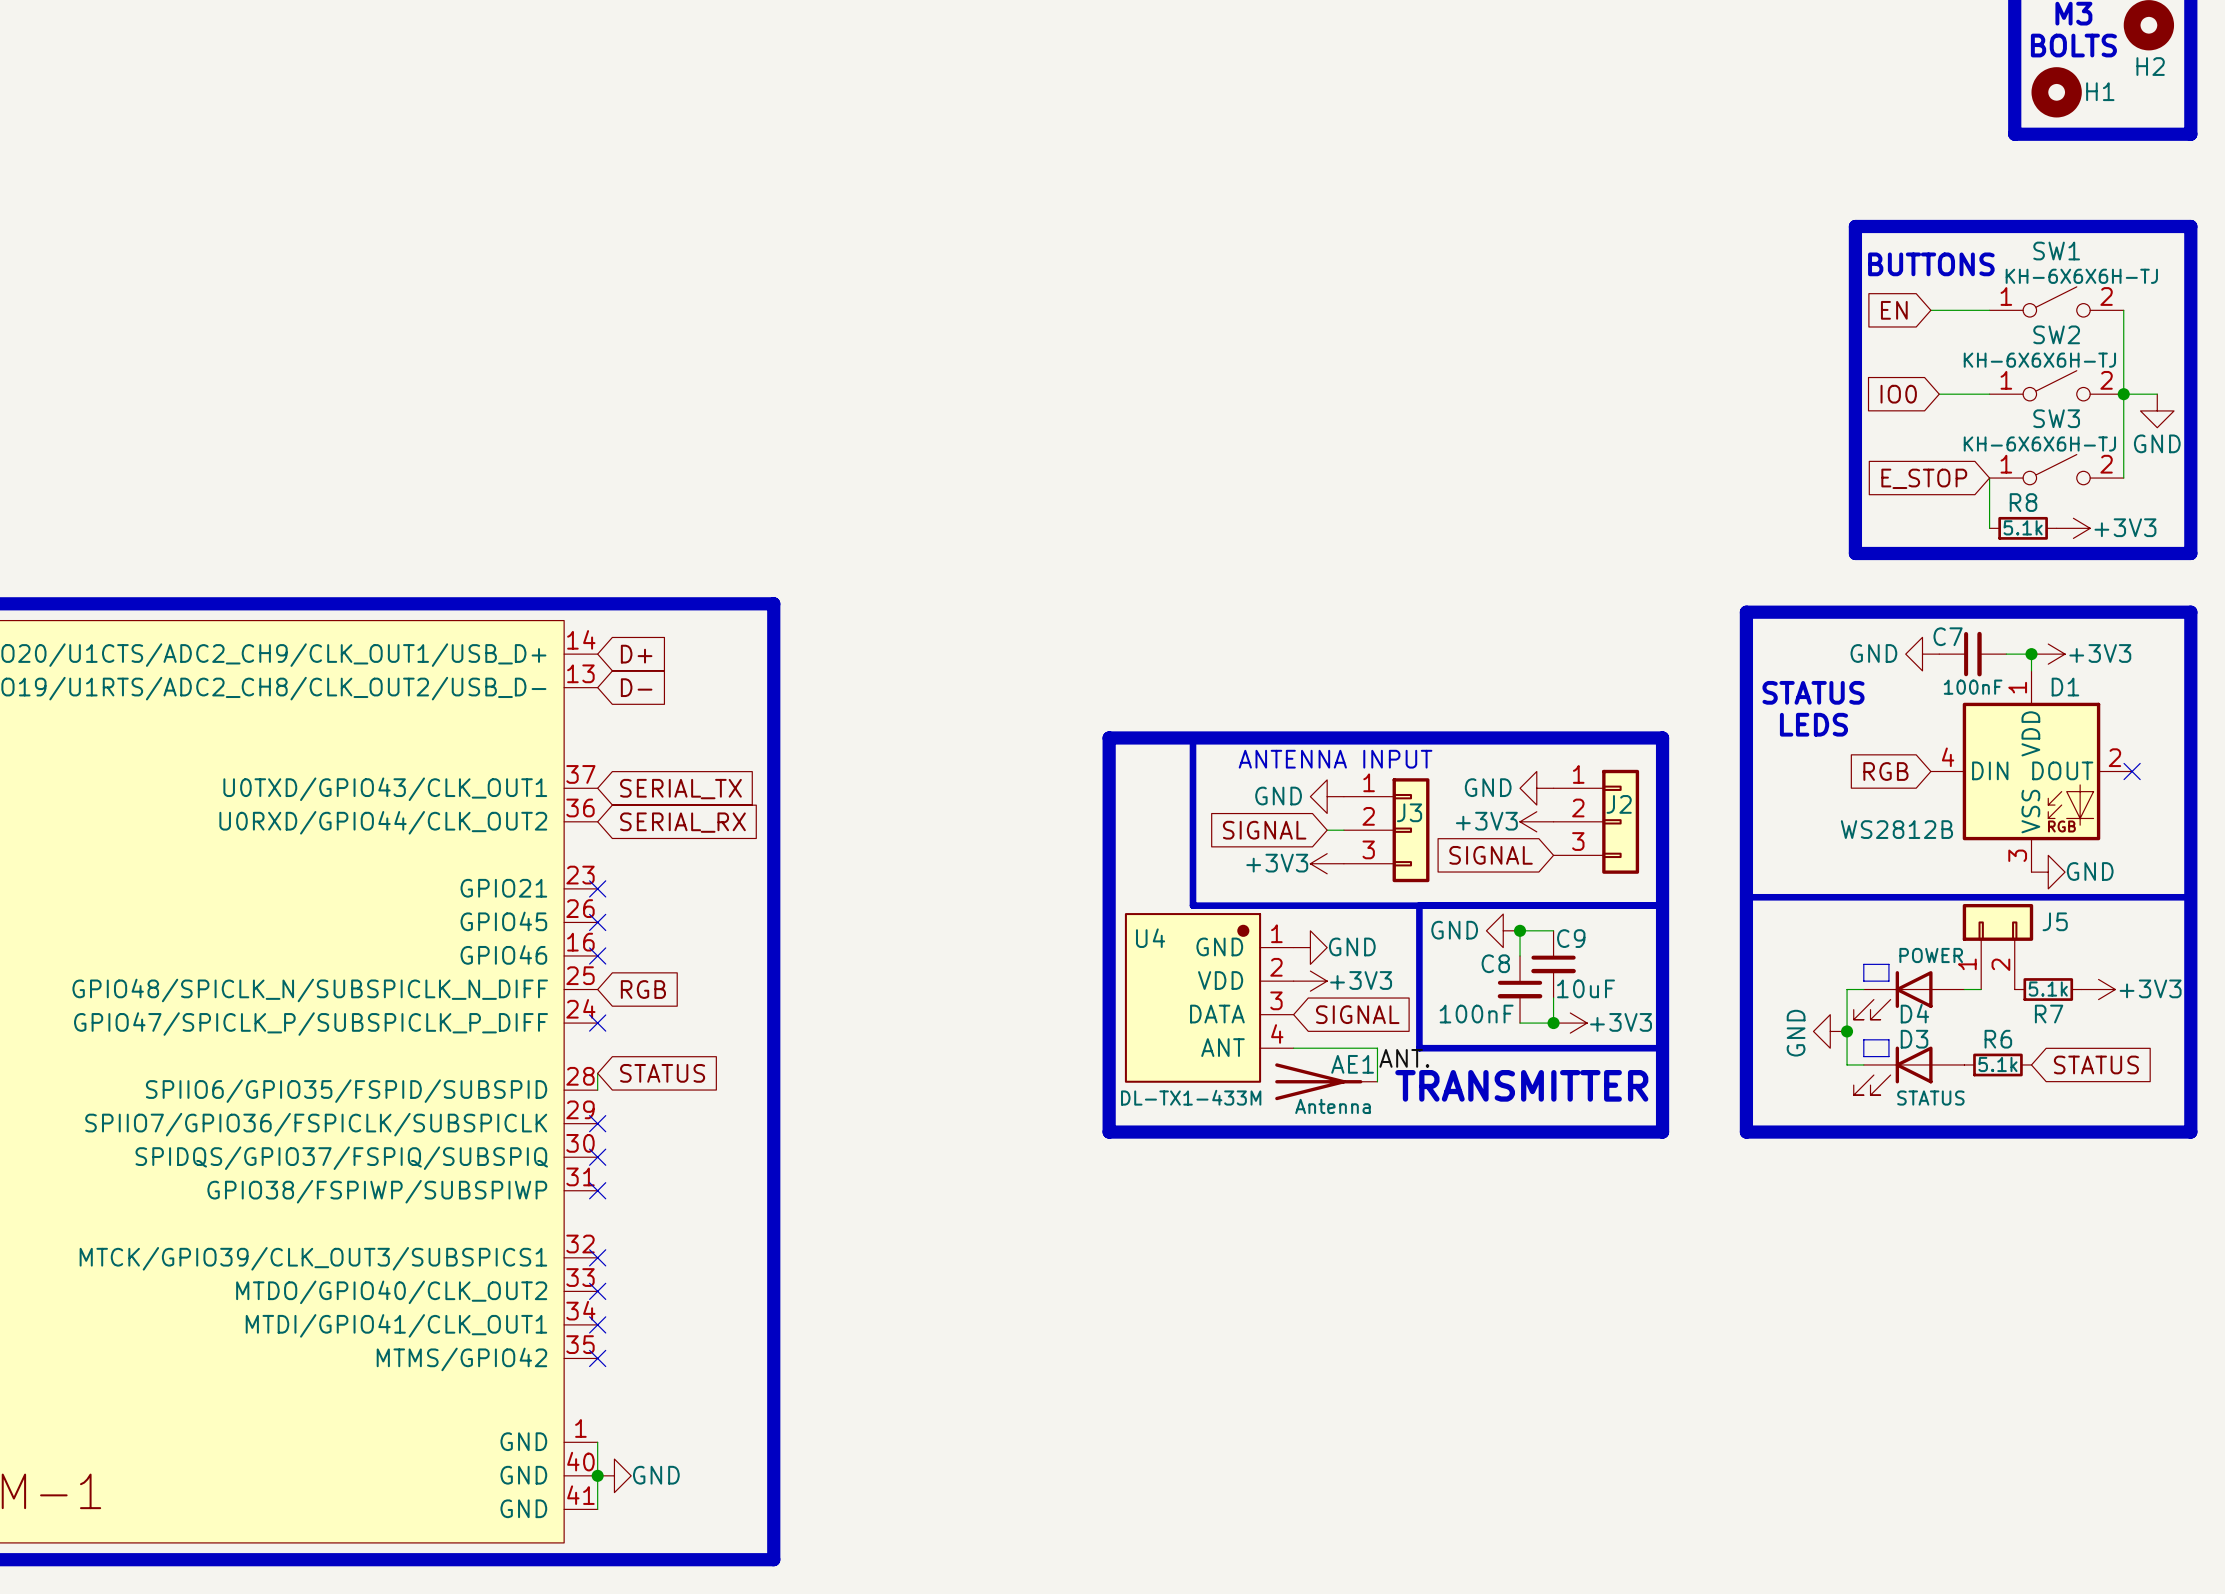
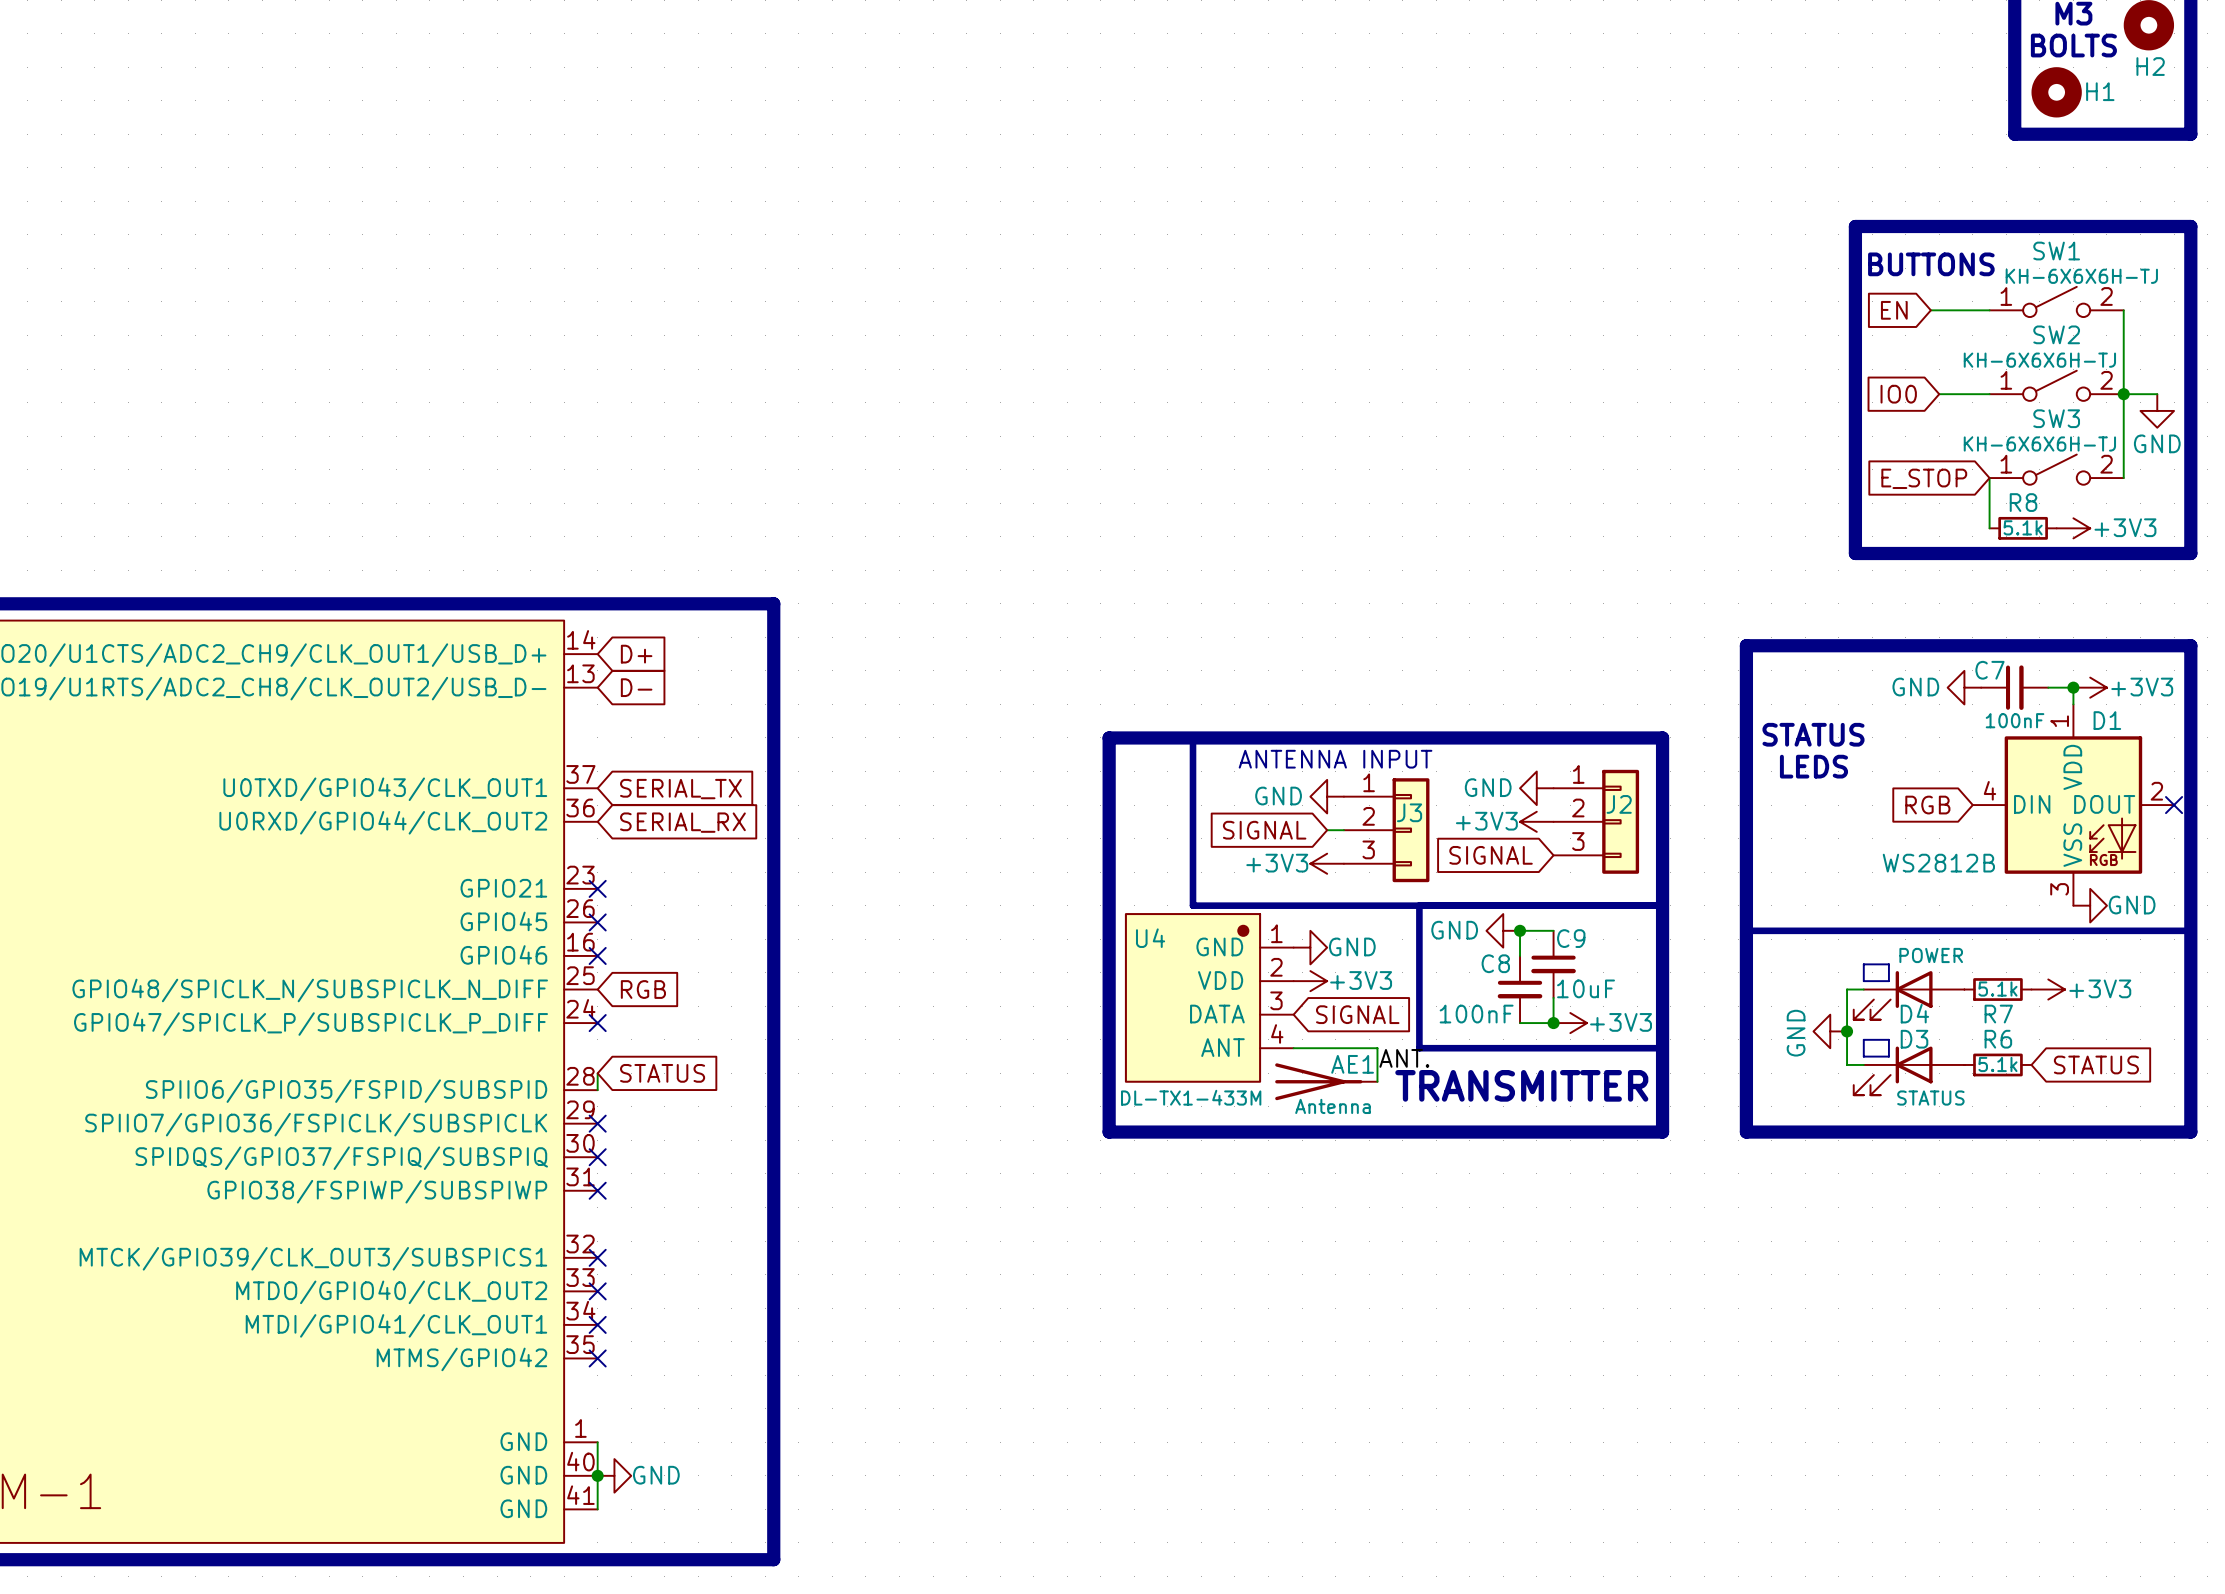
line: (1746, 645) (1746, 612) (2190, 612) (2190, 645) -> (1746, 645) (2190, 645)
power symbol position: GND (1922, 654) -> GND (1964, 687)
C7 position: (1972, 654) -> (2014, 687)
wire: (2006, 654) (2031, 654) (2031, 670) -> (2048, 687) (2073, 687) (2073, 704)
junction position: (2031, 654) -> (2073, 687)
power symbol position: +3V3 (2048, 654) -> +3V3 (2090, 687)
text position: STATUS (1813, 692) -> STATUS (1813, 734)
text position: LEDS (1813, 724) -> LEDS (1813, 766)
global label position: RGB (1885, 771) -> RGB (1927, 805)
D1 position: (2031, 771) -> (2073, 805)
no-connect mark position: (2132, 771) -> (2174, 805)
power symbol position: GND (2048, 872) -> GND (2090, 905)
line: (1746, 930) (1746, 897) (2190, 897) (2190, 930) -> (1746, 930) (2190, 930)
J5: (1997, 946) -> none
R7 position: (2048, 989) -> (1997, 989)
power symbol position: +3V3 (2098, 989) -> +3V3 (2048, 989)

